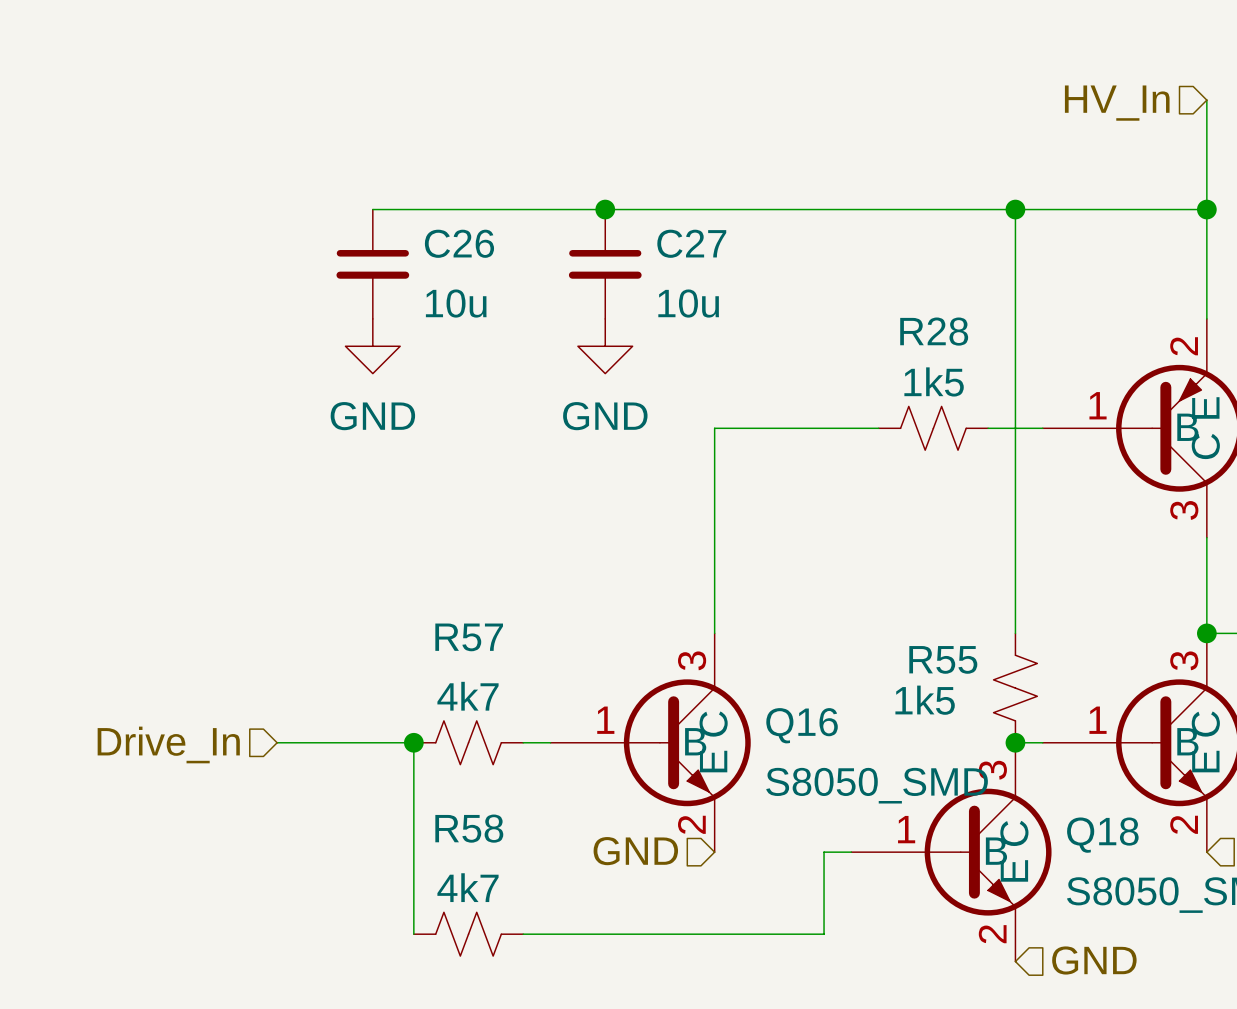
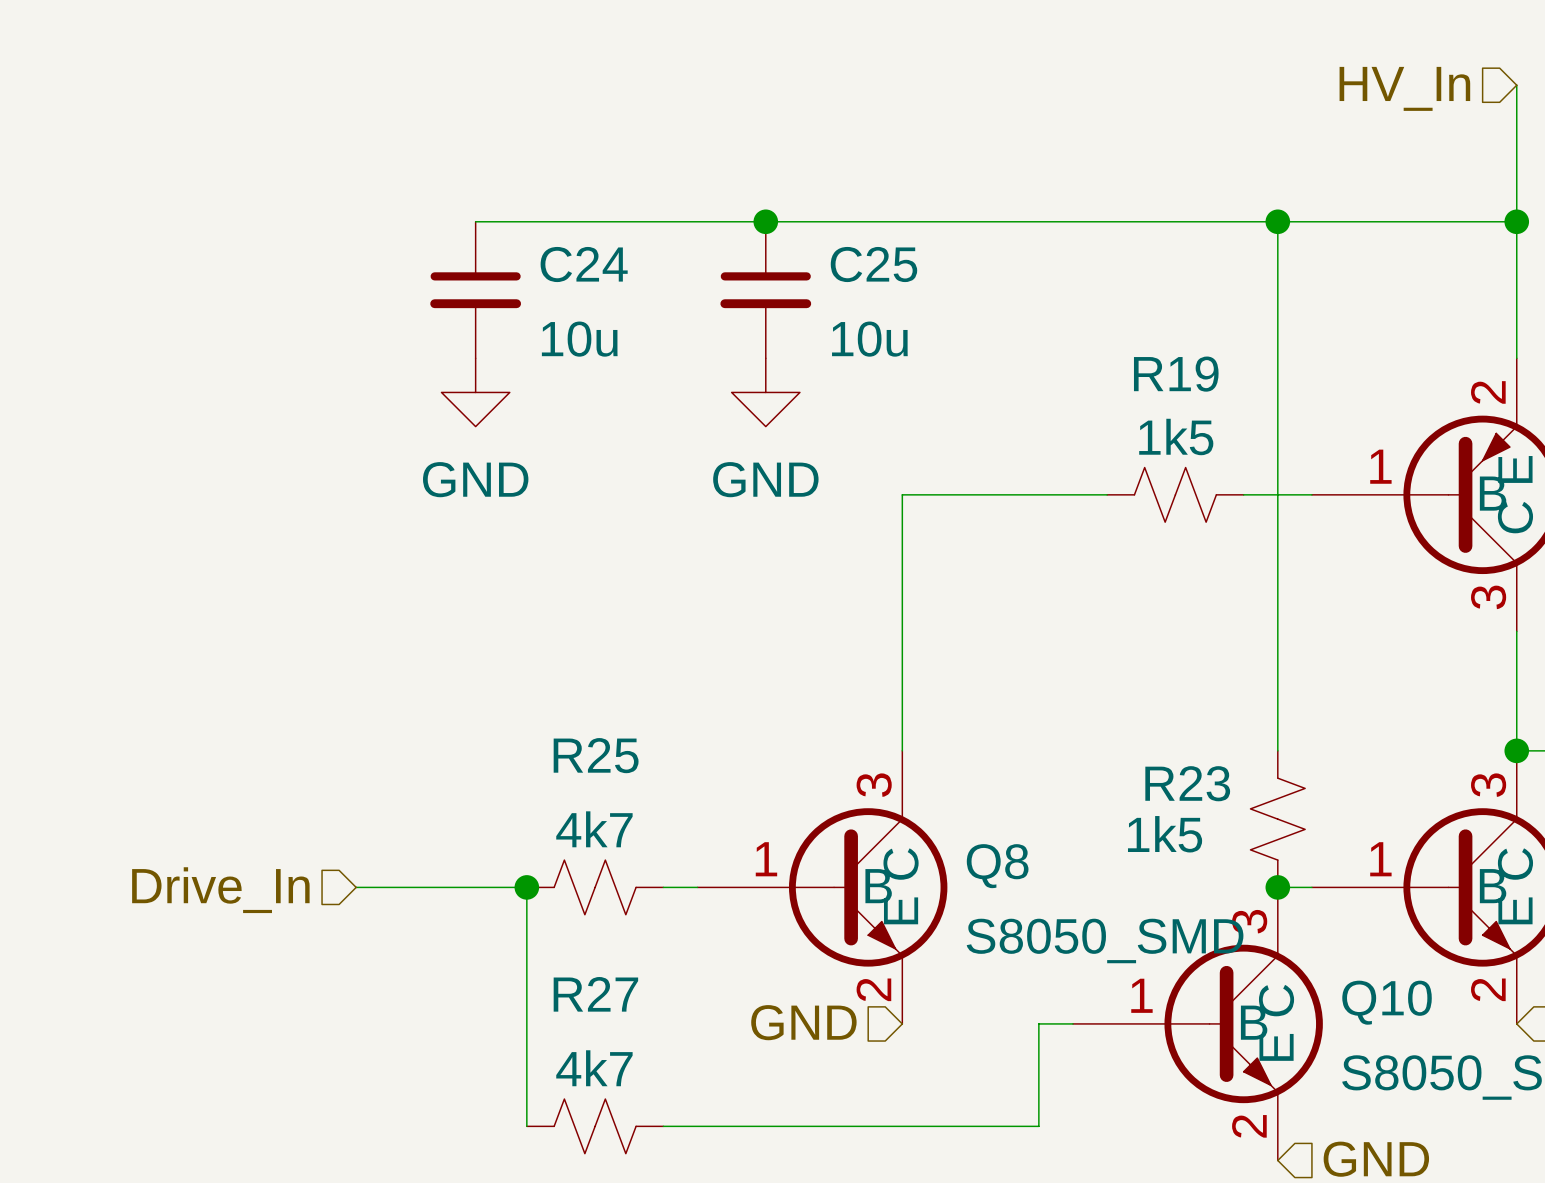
C26 name: C26 (459, 243) -> C24 (584, 264)
C27 name: C27 (691, 243) -> C25 (873, 264)
R28 name: R28 (934, 331) -> R19 (1176, 374)
R57 name: R57 (469, 637) -> R25 (596, 755)
R55 name: R55 (943, 659) -> R23 (1187, 783)
Q16 name: Q16 (802, 725) -> Q8 (997, 866)
R58 name: R58 (469, 828) -> R27 (595, 994)
Q18 name: Q18 (1102, 835) -> Q10 (1387, 1002)

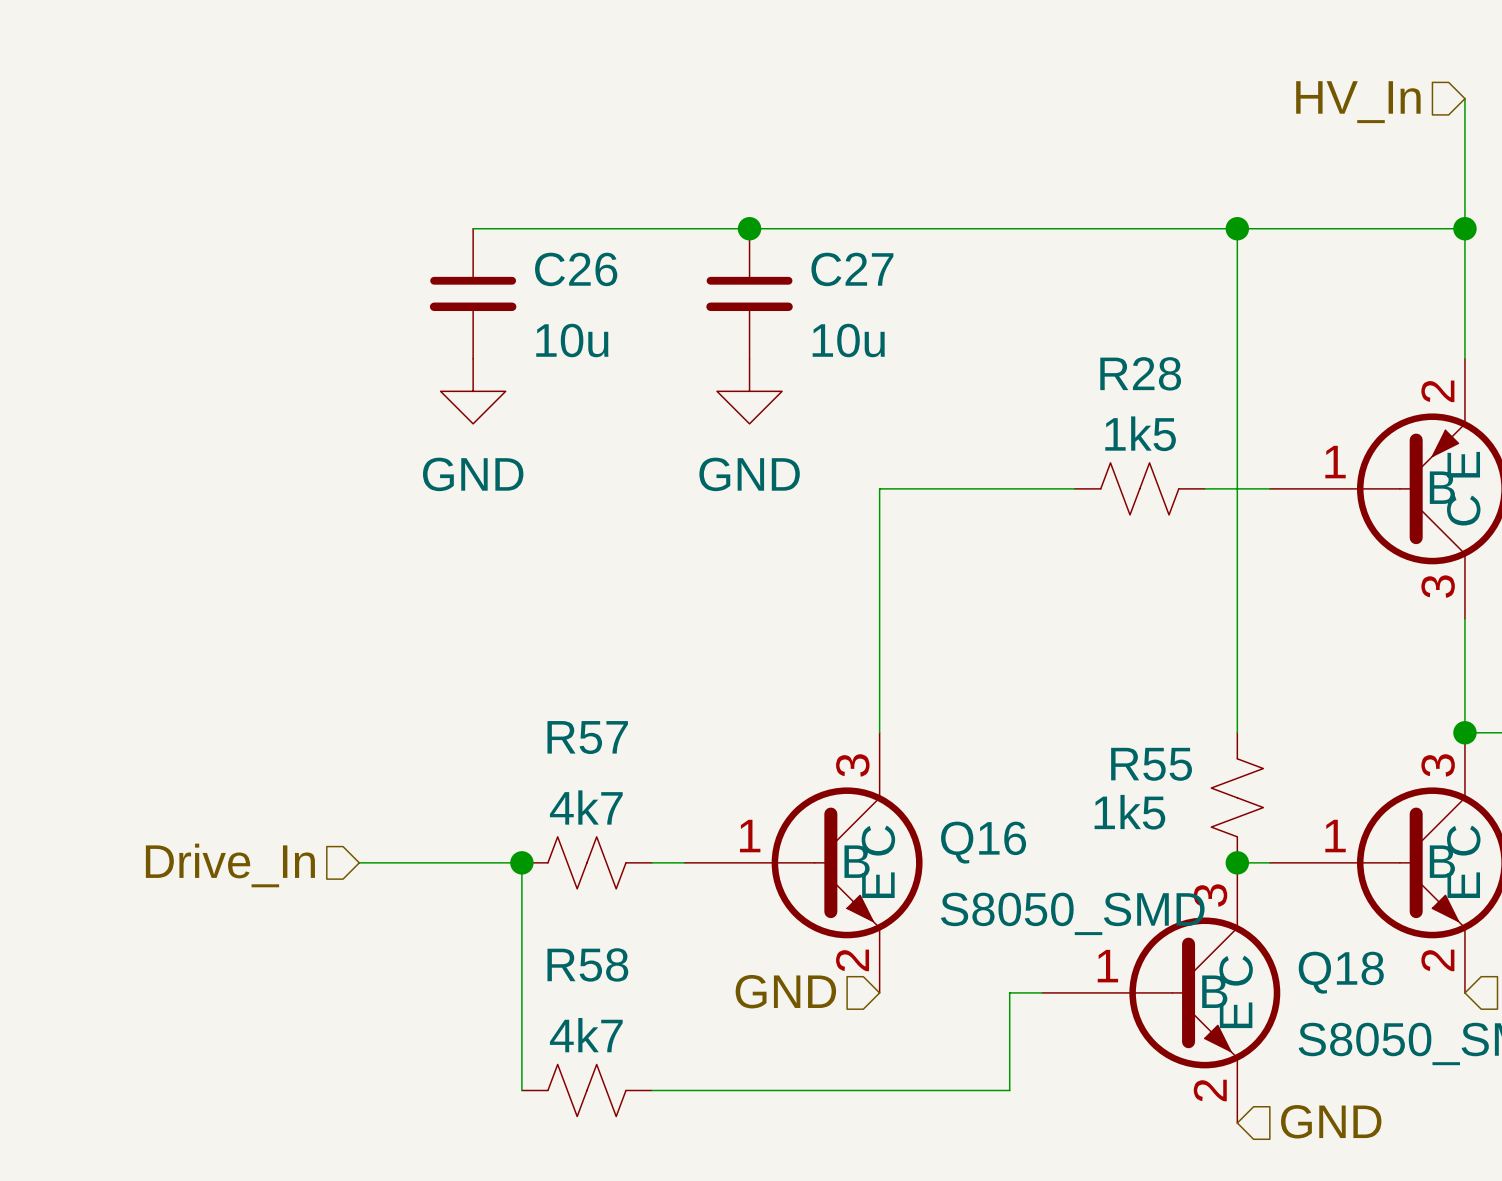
C24 name: C24 (584, 264) -> C26 (576, 269)
C25 name: C25 (873, 264) -> C27 (852, 269)
R19 name: R19 (1176, 374) -> R28 (1140, 373)
R25 name: R25 (596, 755) -> R57 (587, 737)
R23 name: R23 (1187, 783) -> R55 (1151, 764)
Q8 name: Q8 (997, 866) -> Q16 (983, 842)
R27 name: R27 (595, 994) -> R58 (587, 964)
Q10 name: Q10 (1387, 1002) -> Q18 (1341, 972)

